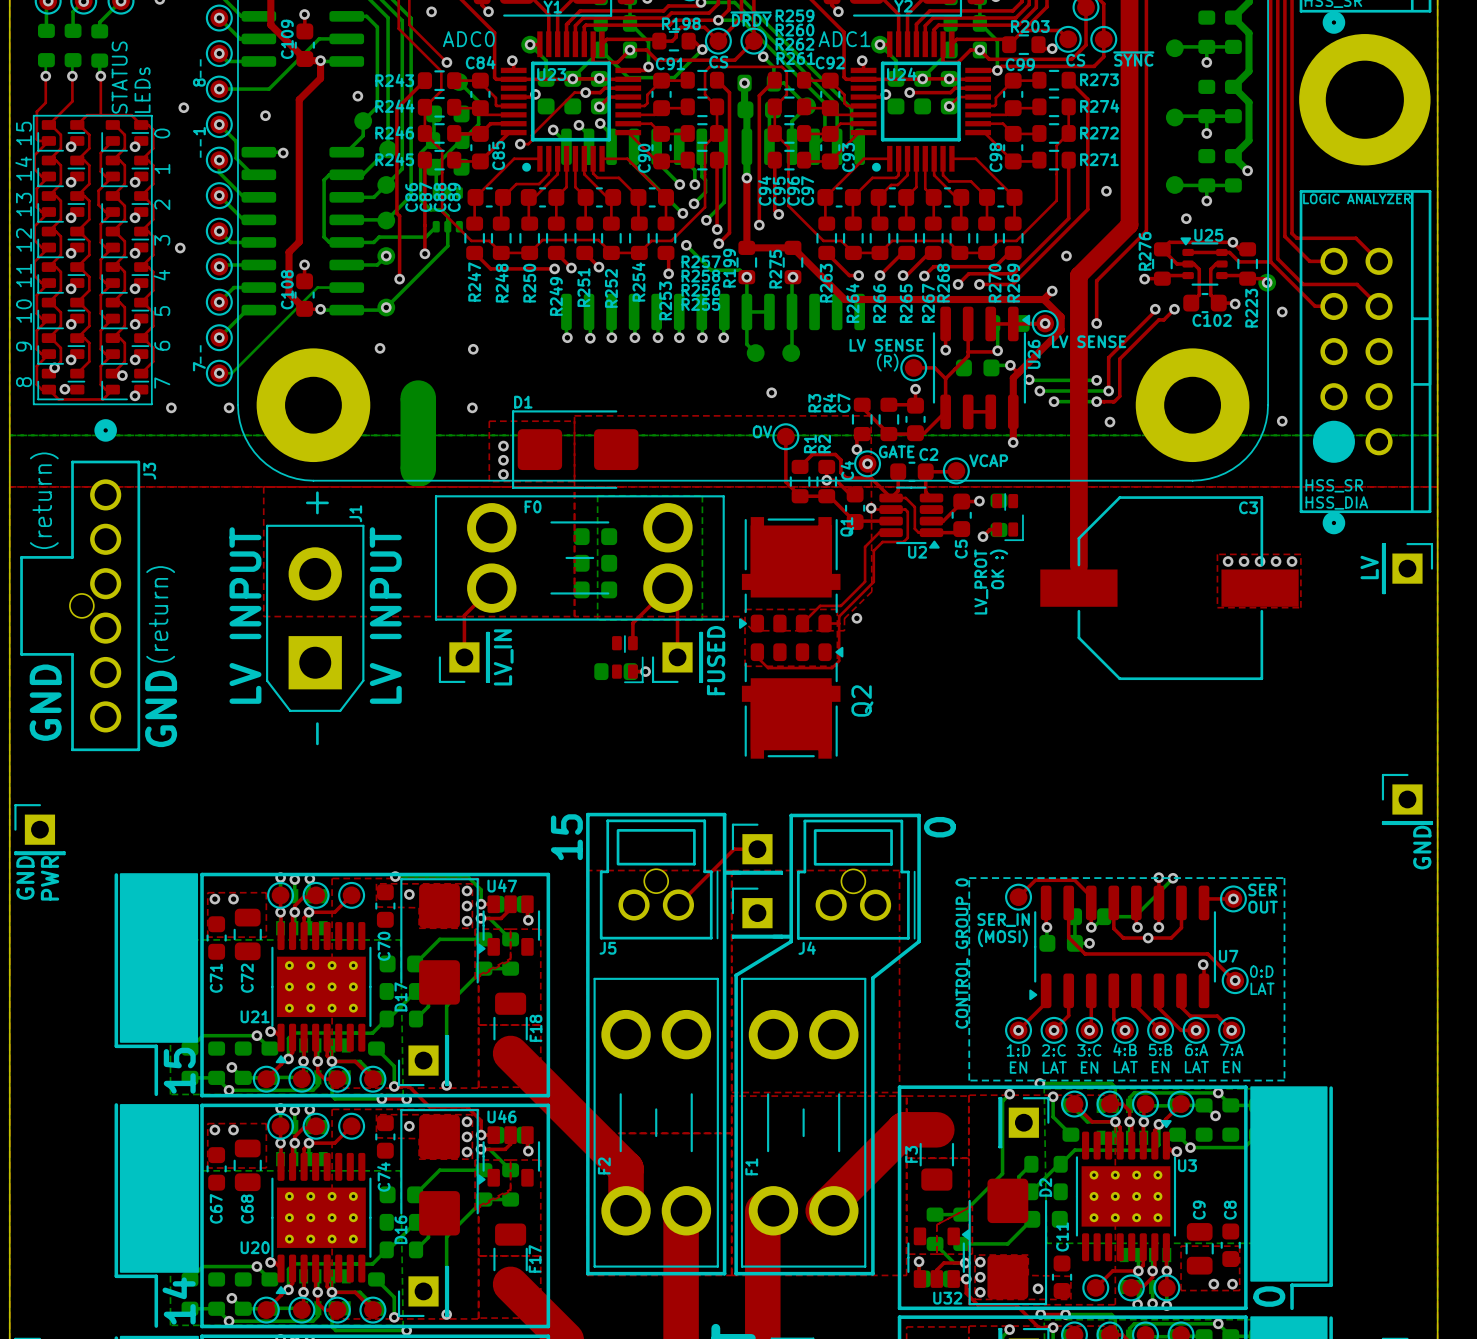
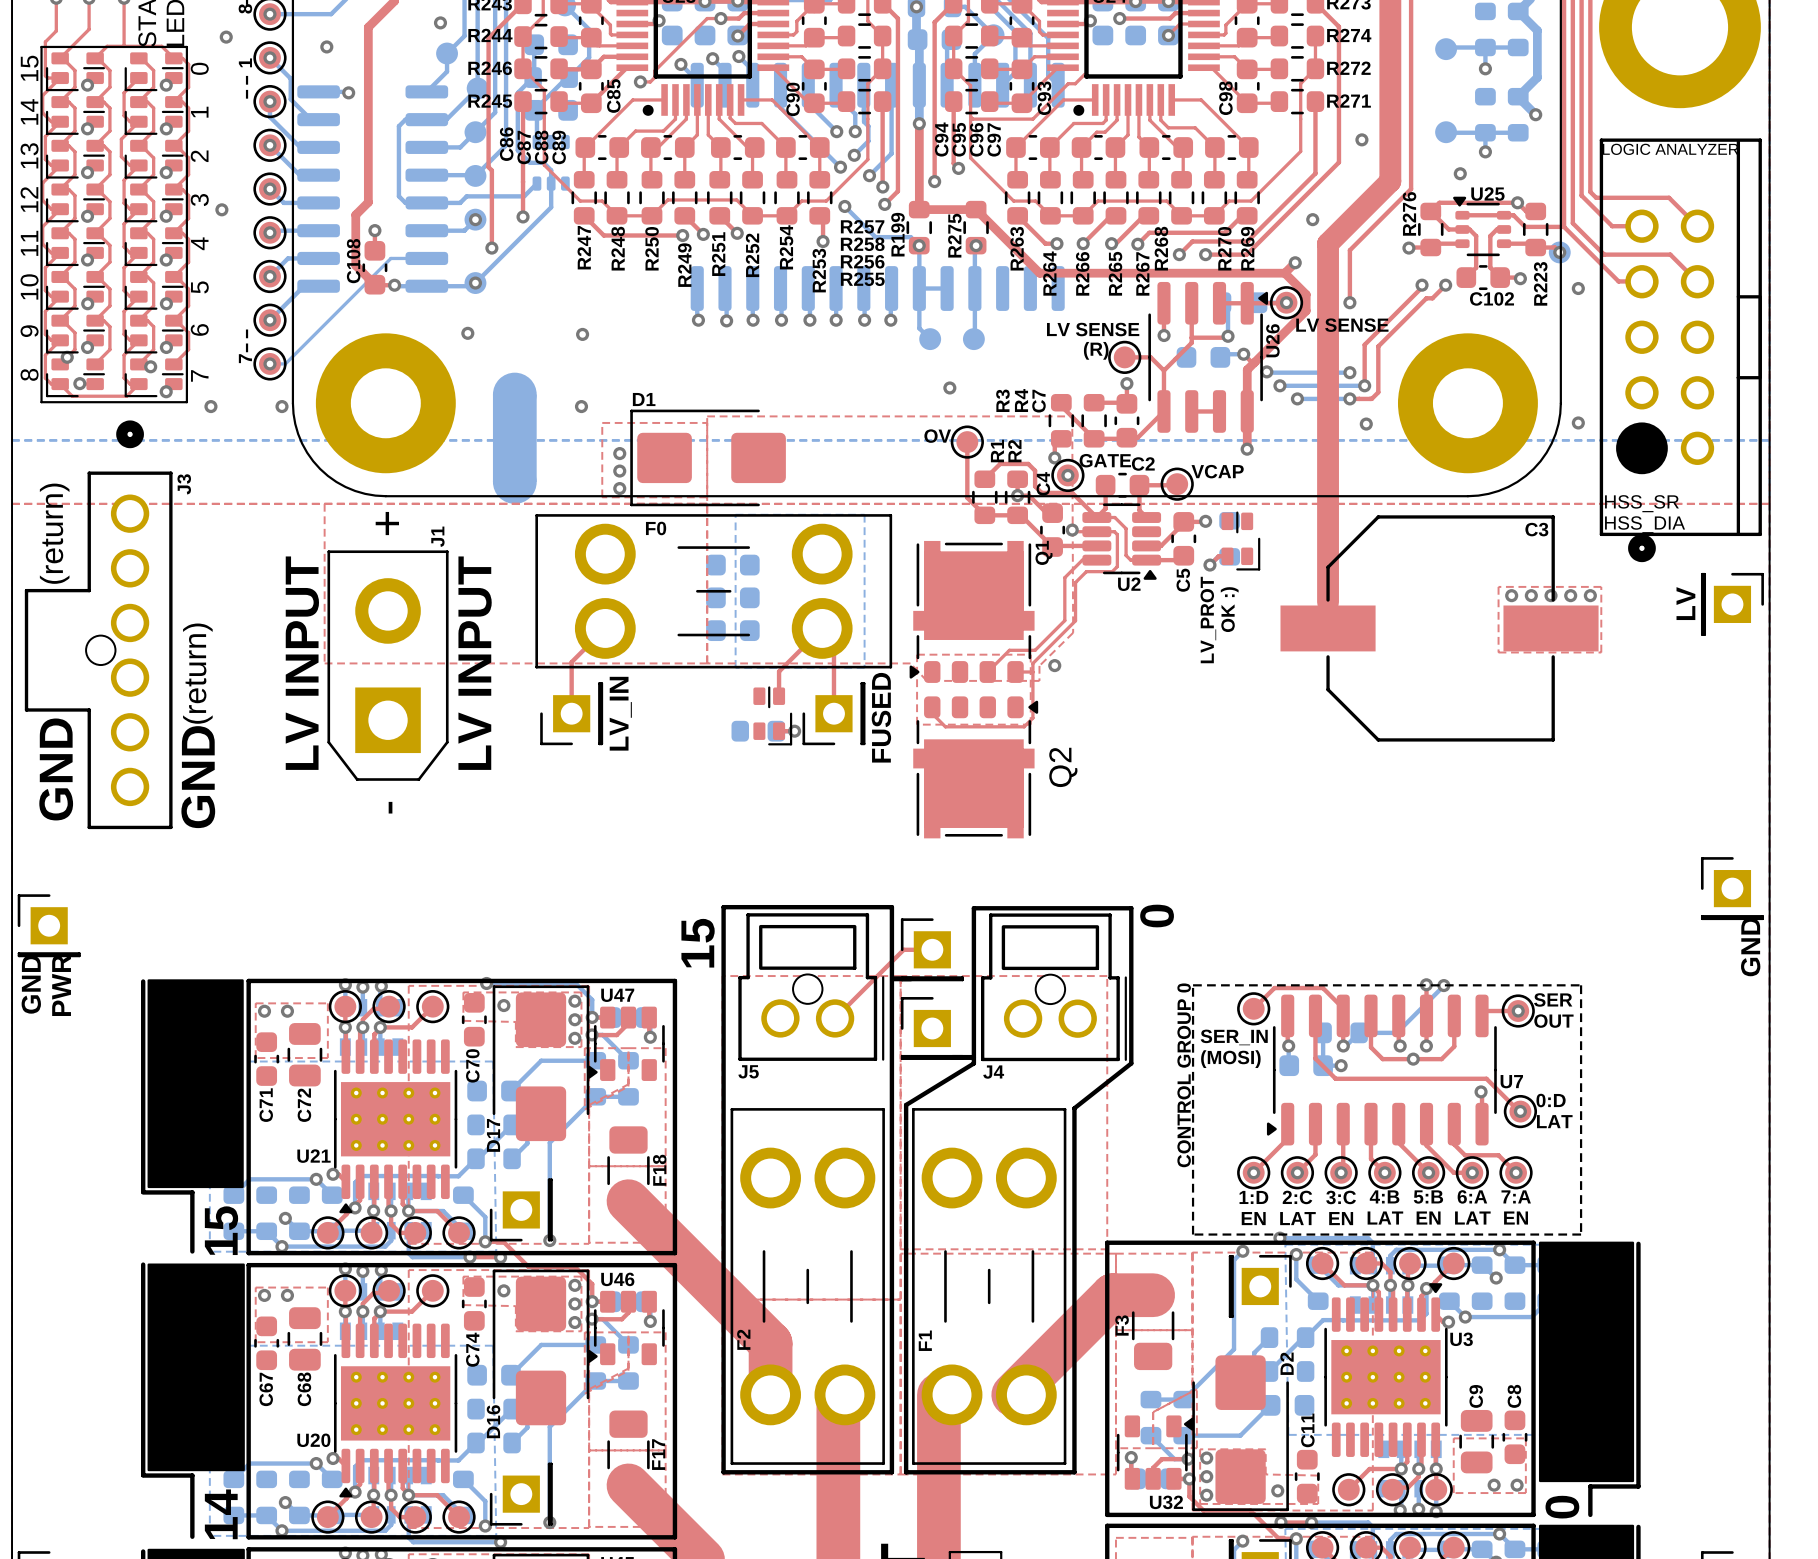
top track: none -> (1084, 74) (1075, 83) (1068, 83) (1032, 119) (972, 119) (970, 116)

